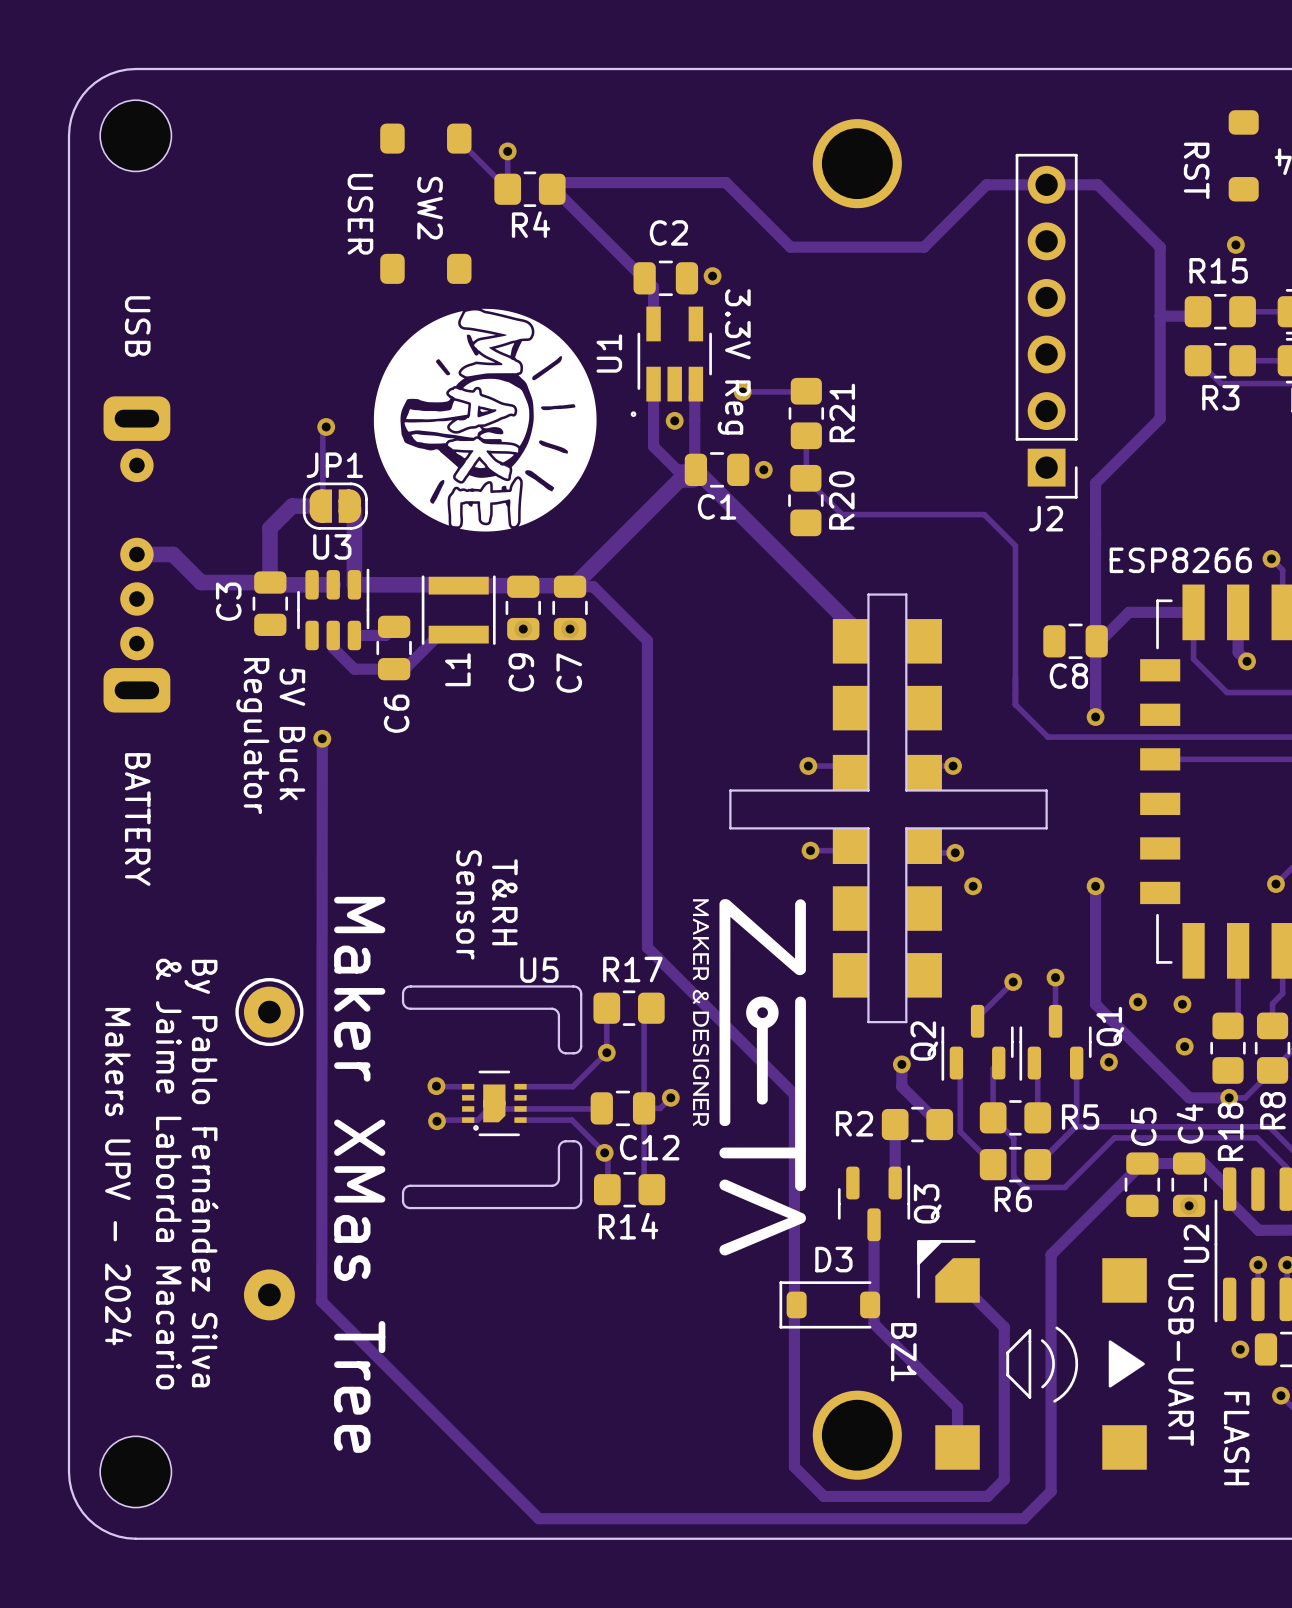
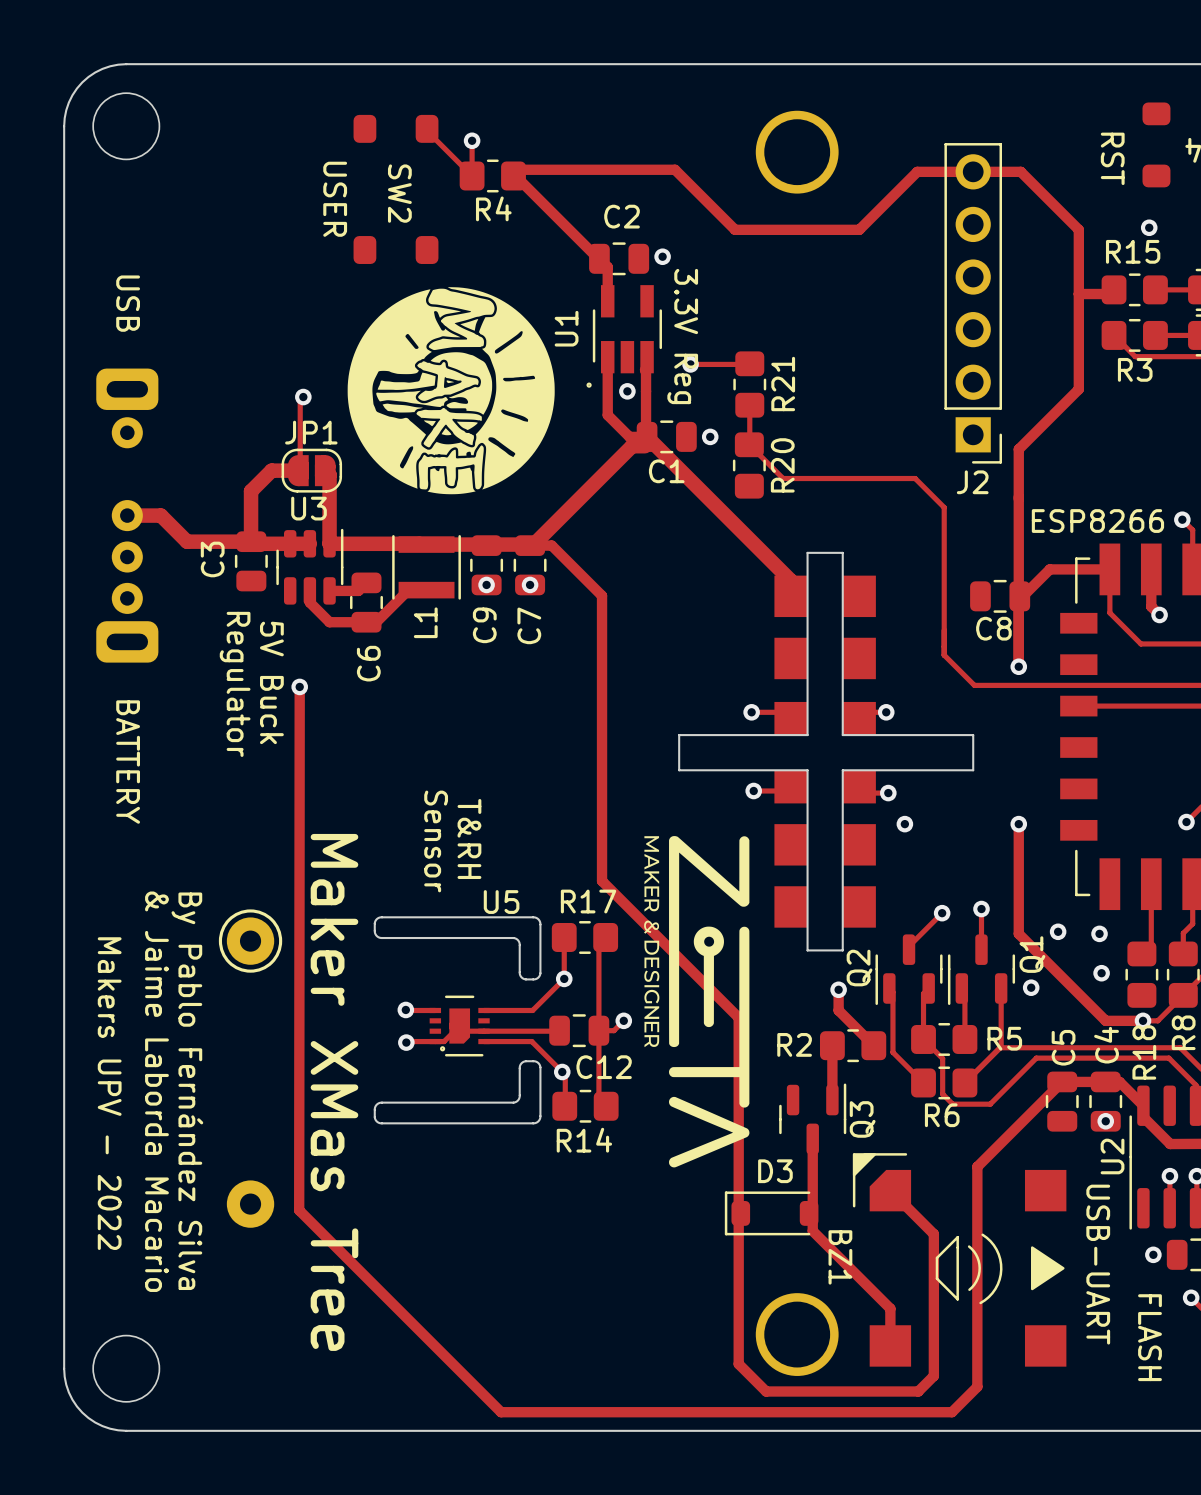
text: Makers UPV - 2024 (118, 1176) -> Makers UPV - 2022 (109, 1093)

